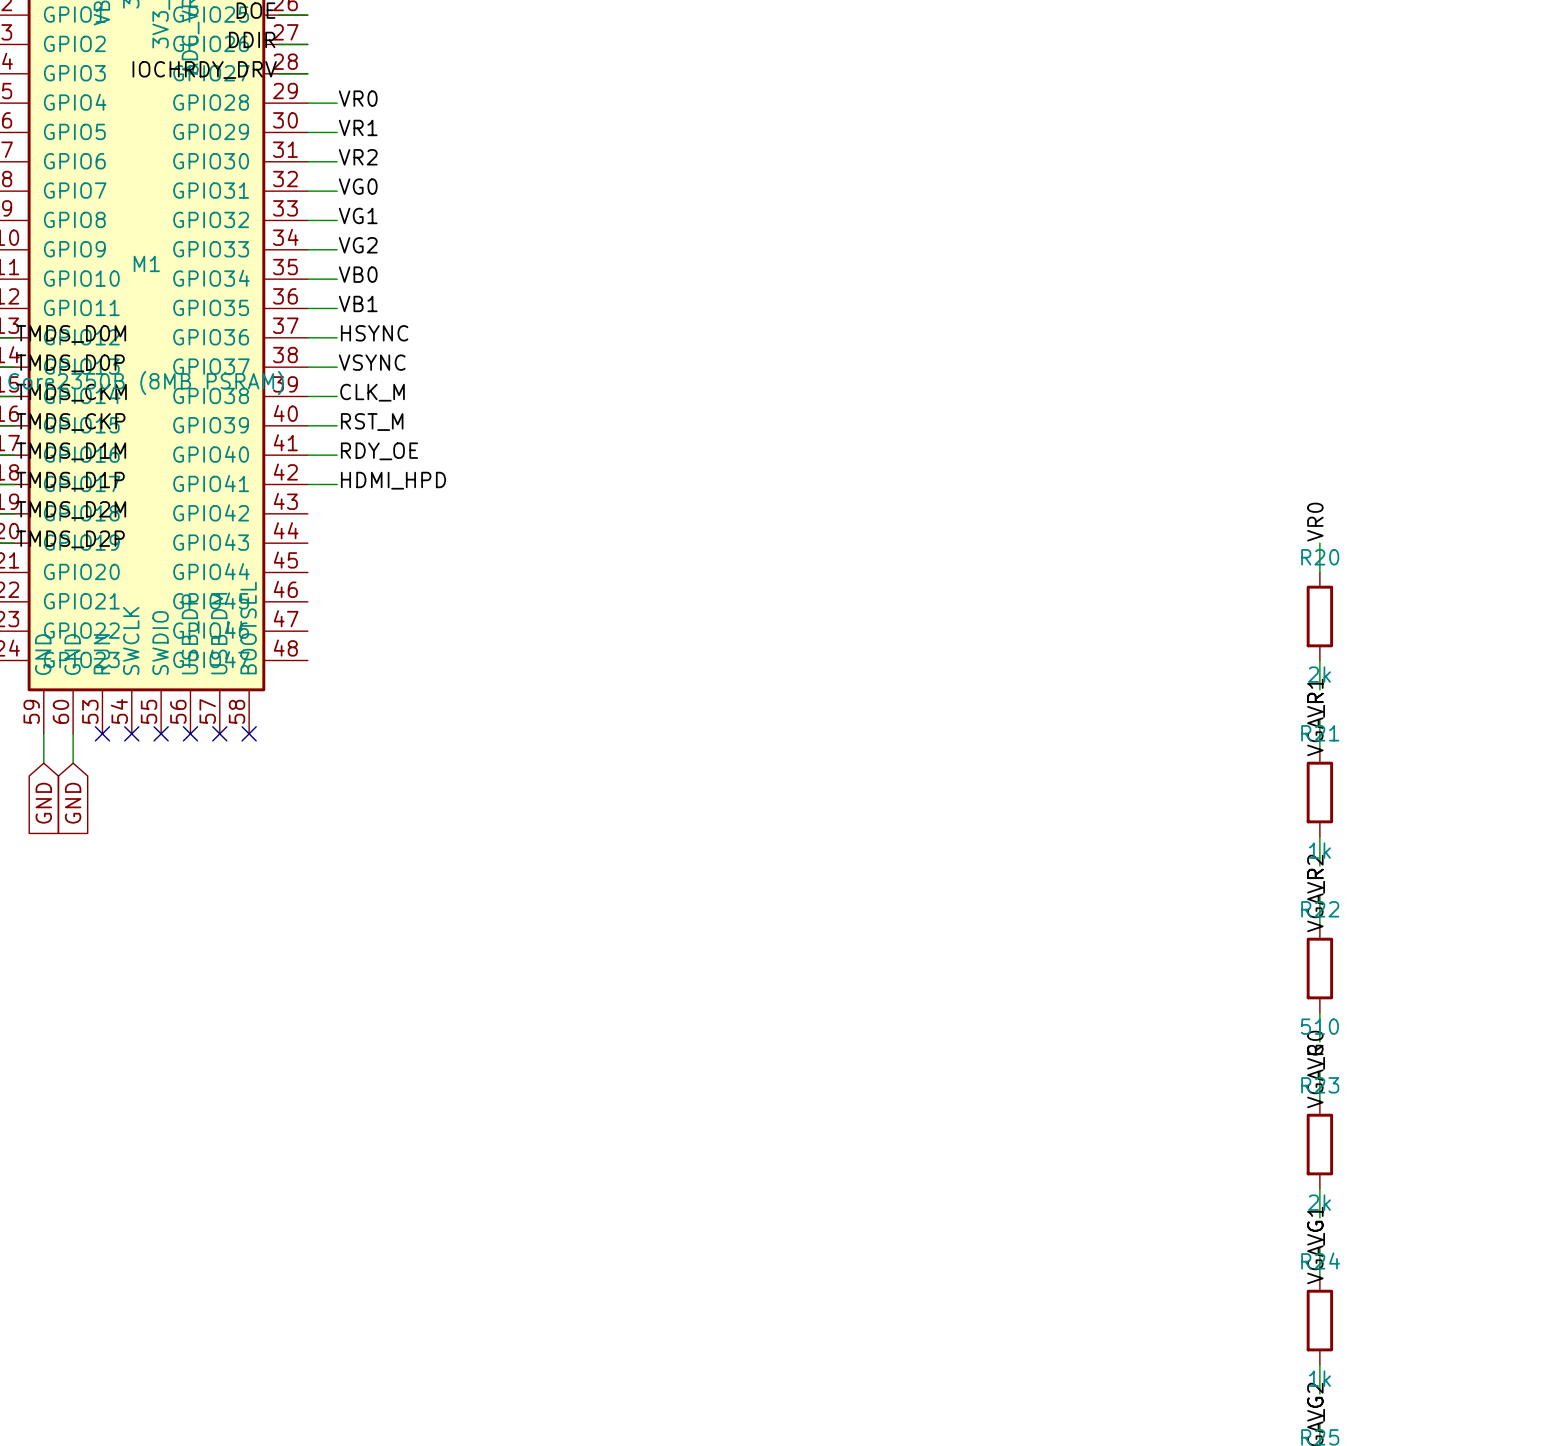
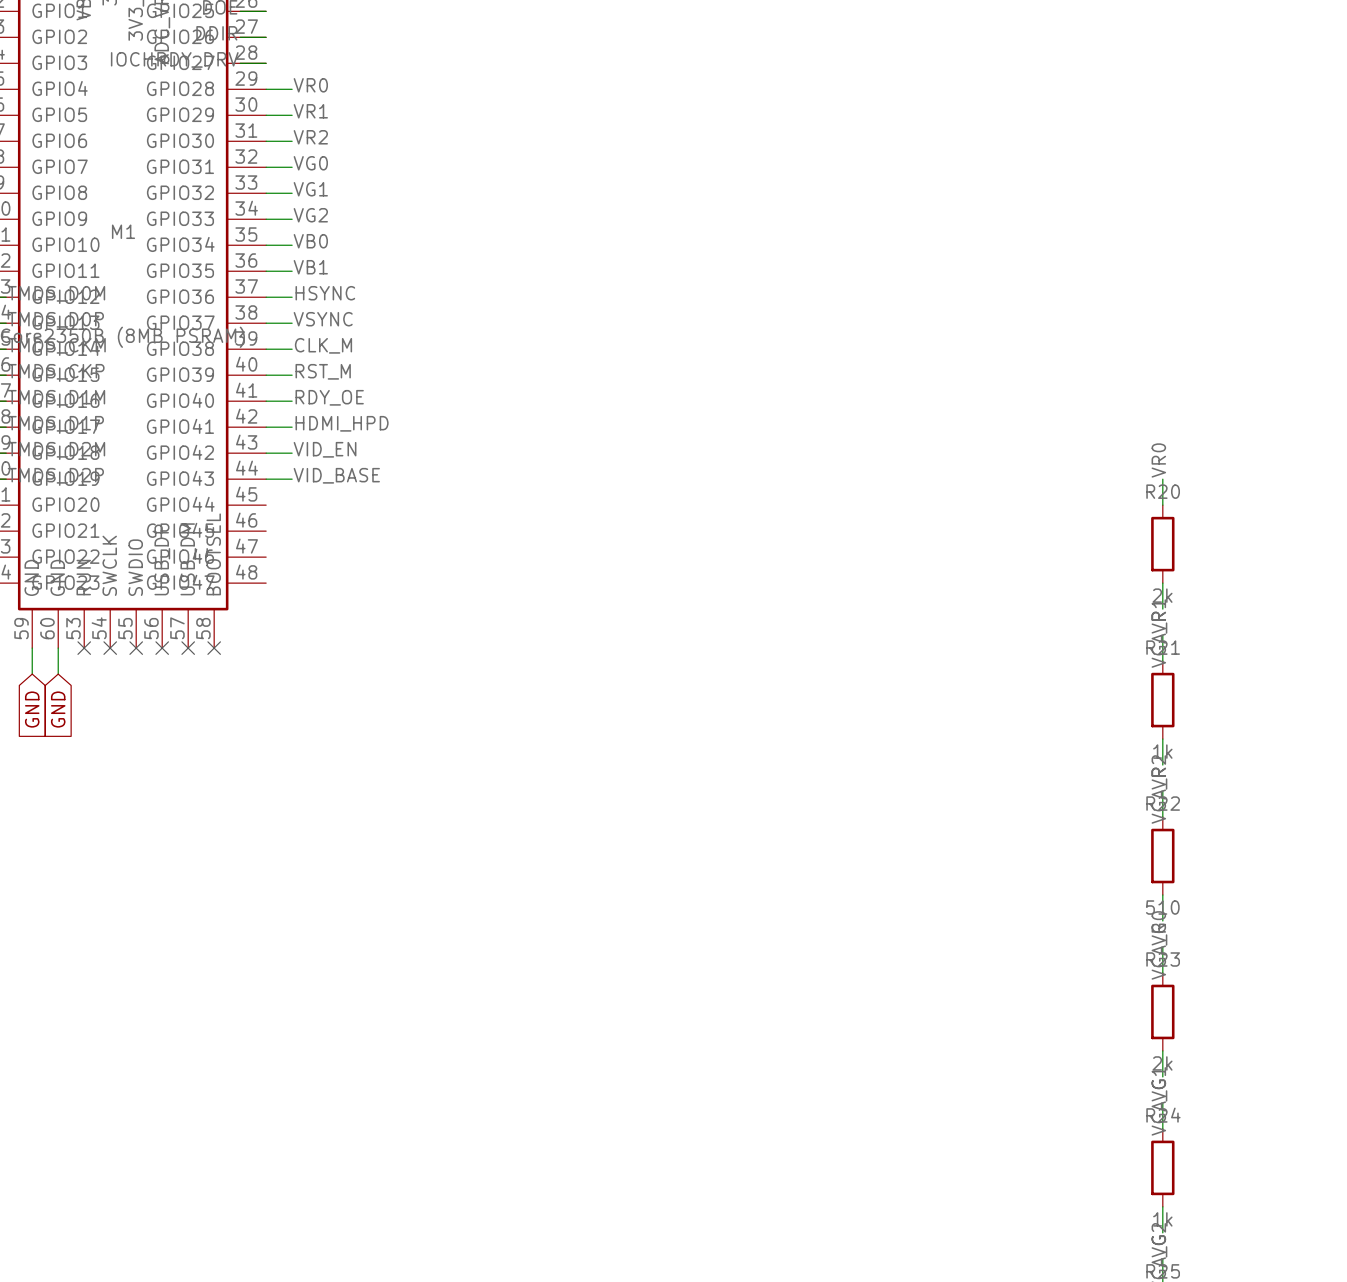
label: none -> VID_EN (325, 449)
wire: none -> (266, 453) (292, 453)
label: none -> VID_BASE (336, 475)
wire: none -> (266, 479) (292, 479)

